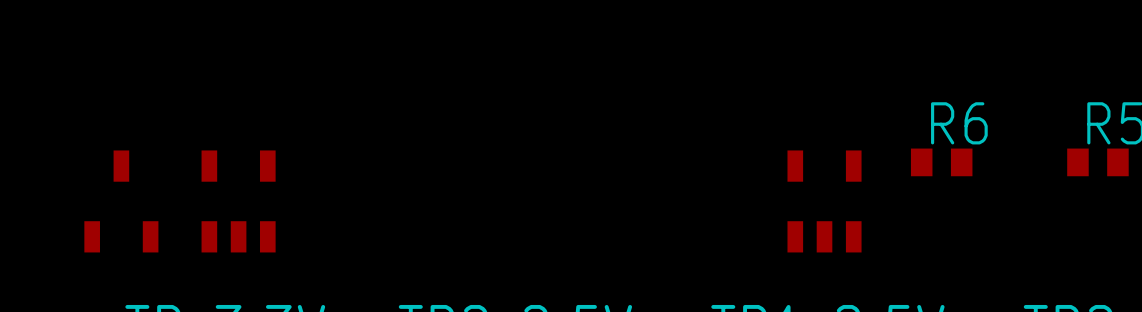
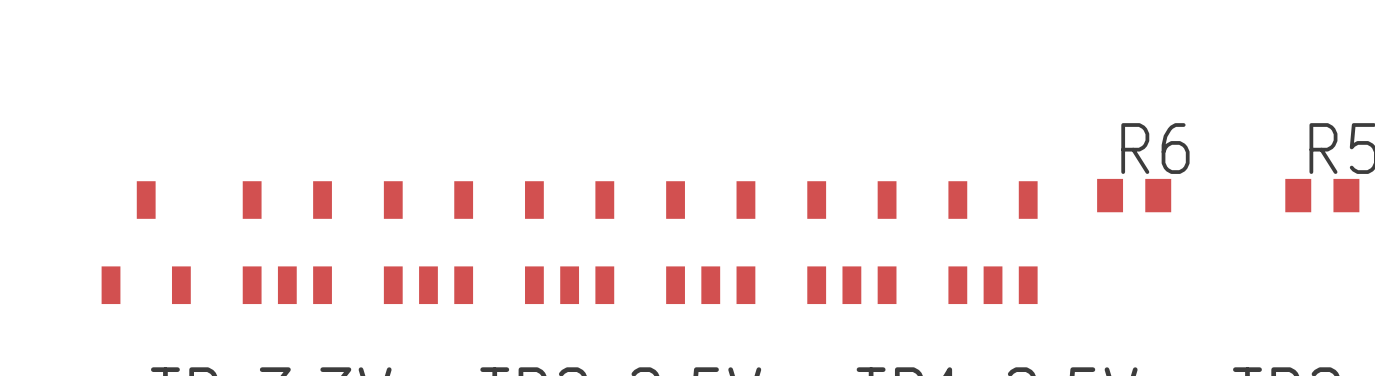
part: none -> (428, 242)
part: none -> (569, 242)
part: none -> (710, 242)
part: none -> (851, 242)

